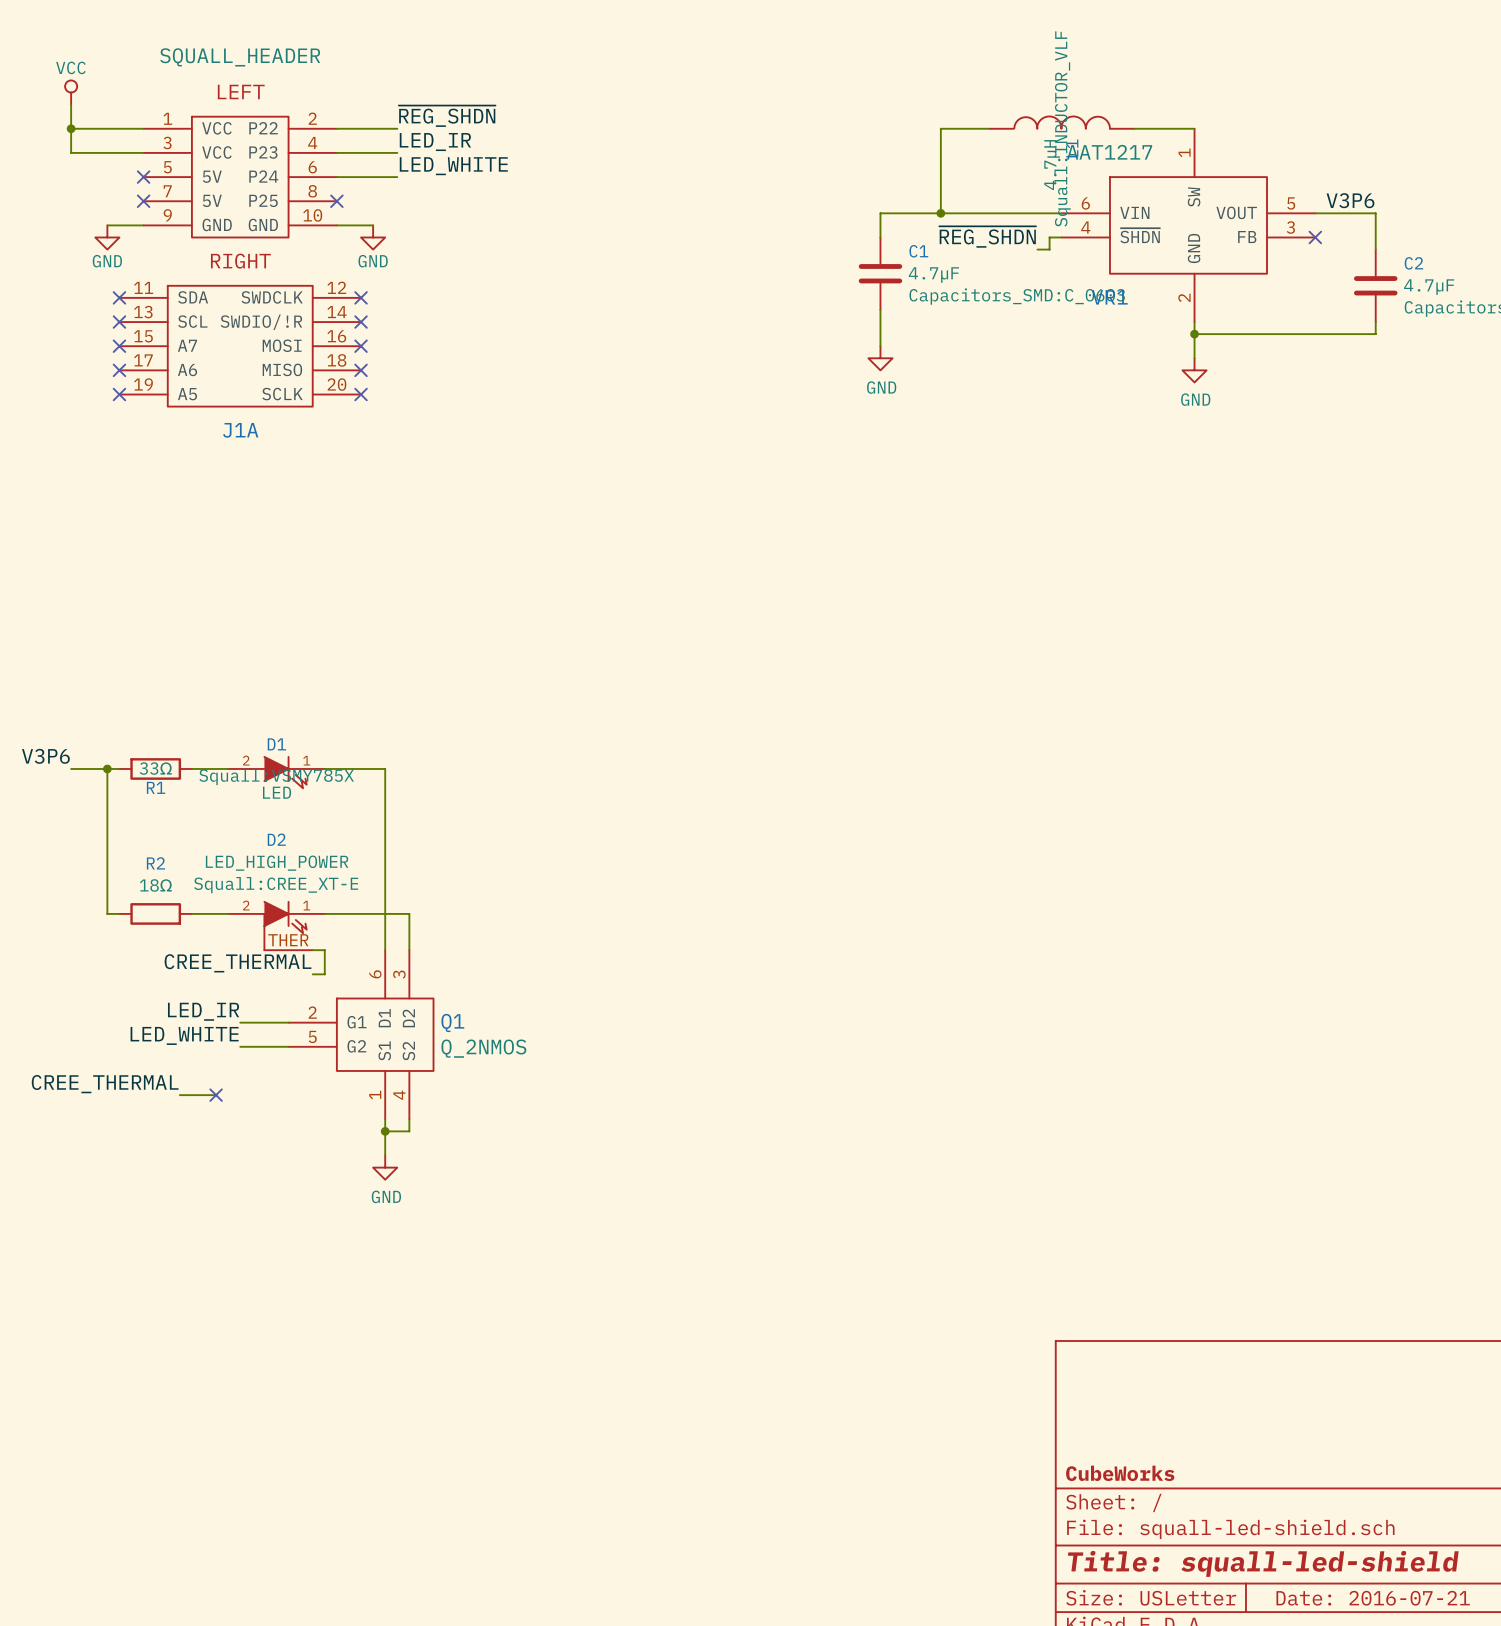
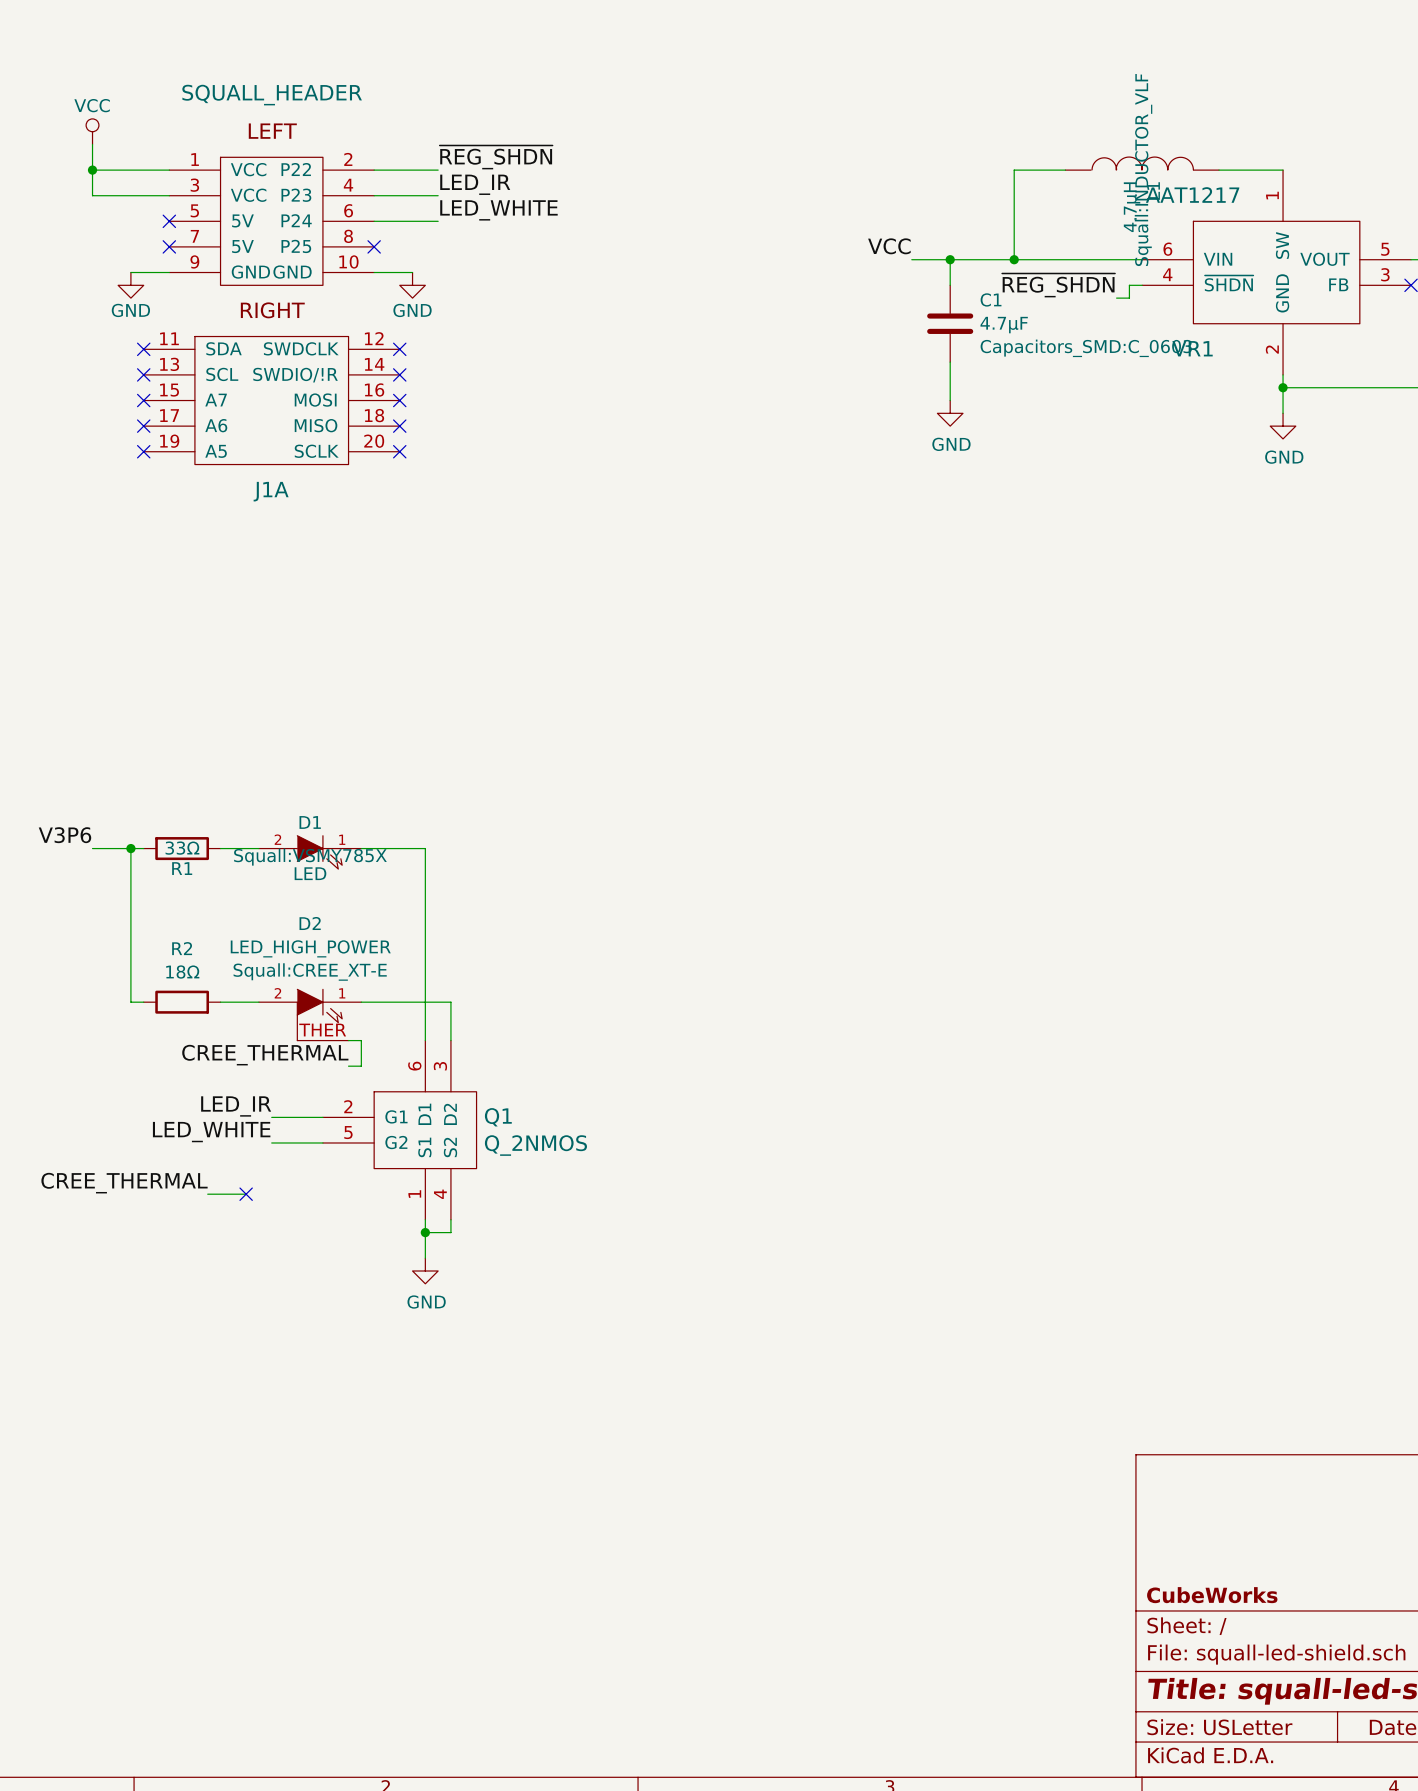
label: none -> VCC (889, 246)
wire: none -> (911, 259) (950, 259)
junction: none -> (950, 259)

